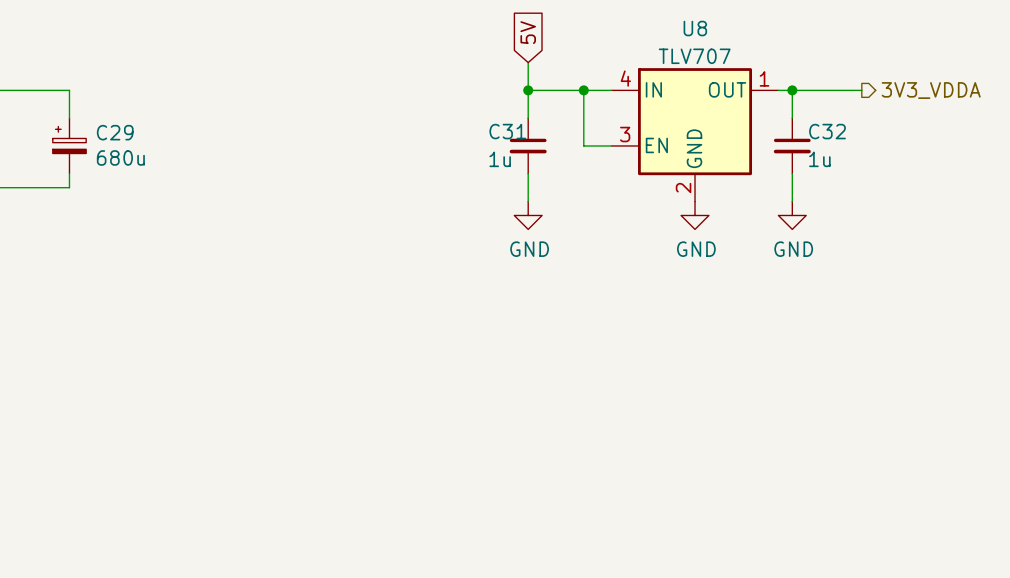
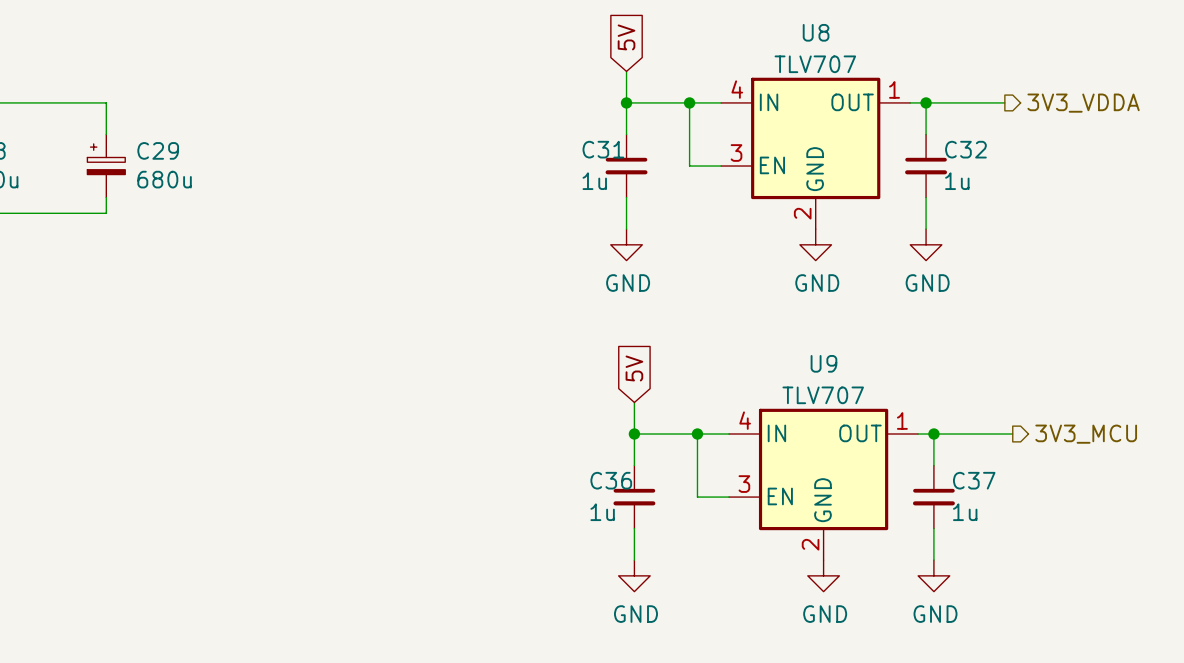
global label: none -> 5V (634, 368)
wire: none -> (634, 402) (634, 465)
wire: none -> (634, 434) (729, 434)
junction: none -> (634, 434)
wire: none -> (697, 434) (697, 497) (729, 497)
junction: none -> (697, 434)
wire: none -> (918, 434) (1012, 434)
wire: none -> (933, 434) (933, 465)
junction: none -> (933, 434)
hierarchical label: none -> 3V3_MCU (1086, 434)
U9: none -> TLV707 (823, 484)
C36: none -> 1u (634, 497)
C37: none -> 1u (933, 497)
wire: none -> (634, 528) (634, 560)
wire: none -> (933, 528) (933, 560)
power symbol: none -> GND (634, 575)
power symbol: none -> GND (823, 575)
power symbol: none -> GND (933, 575)

